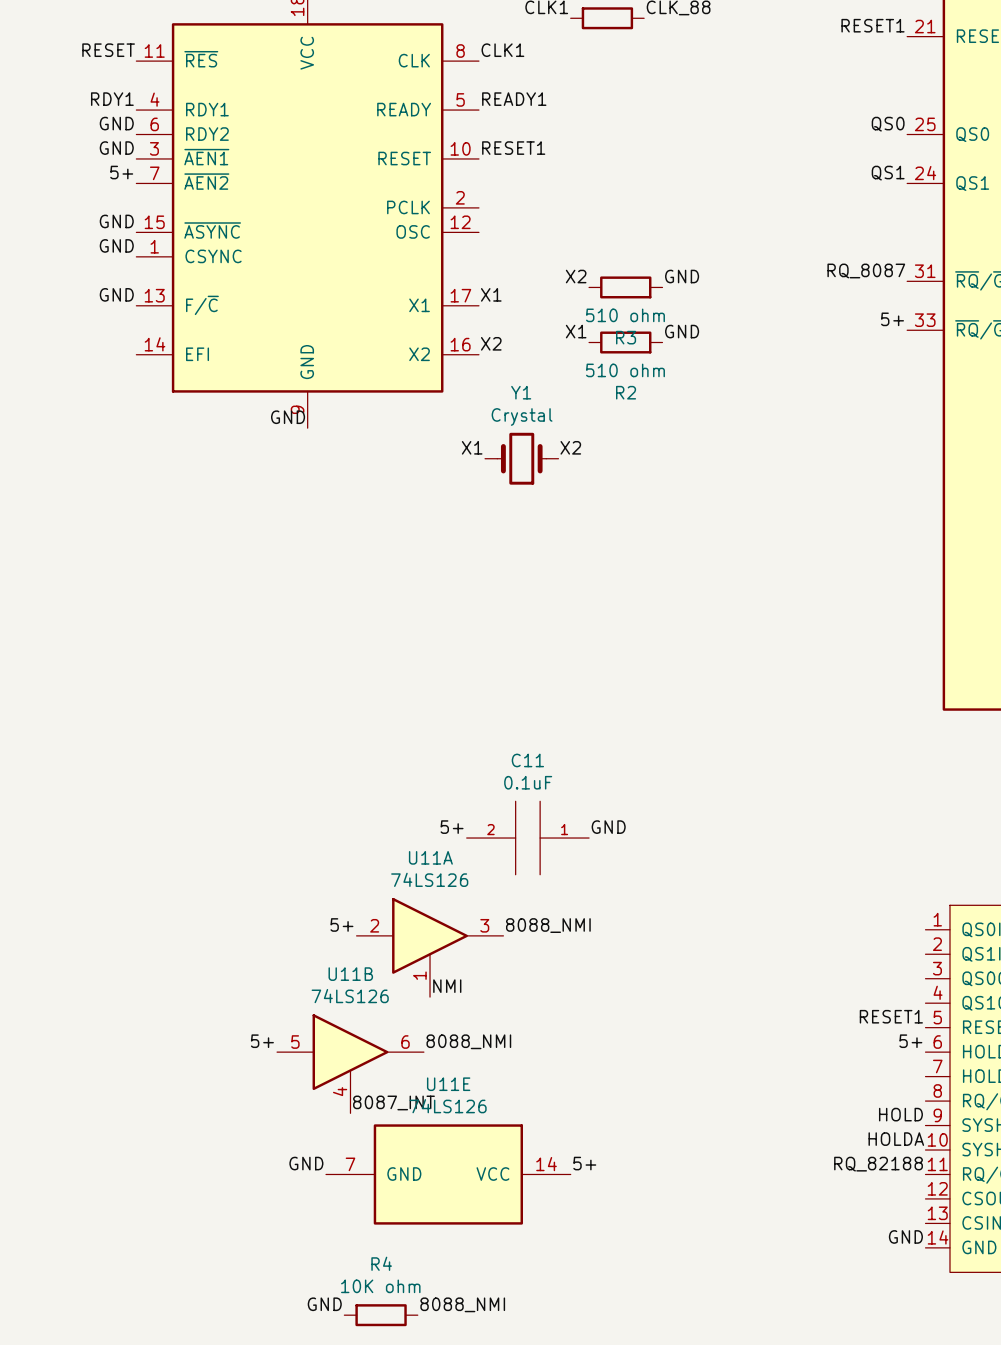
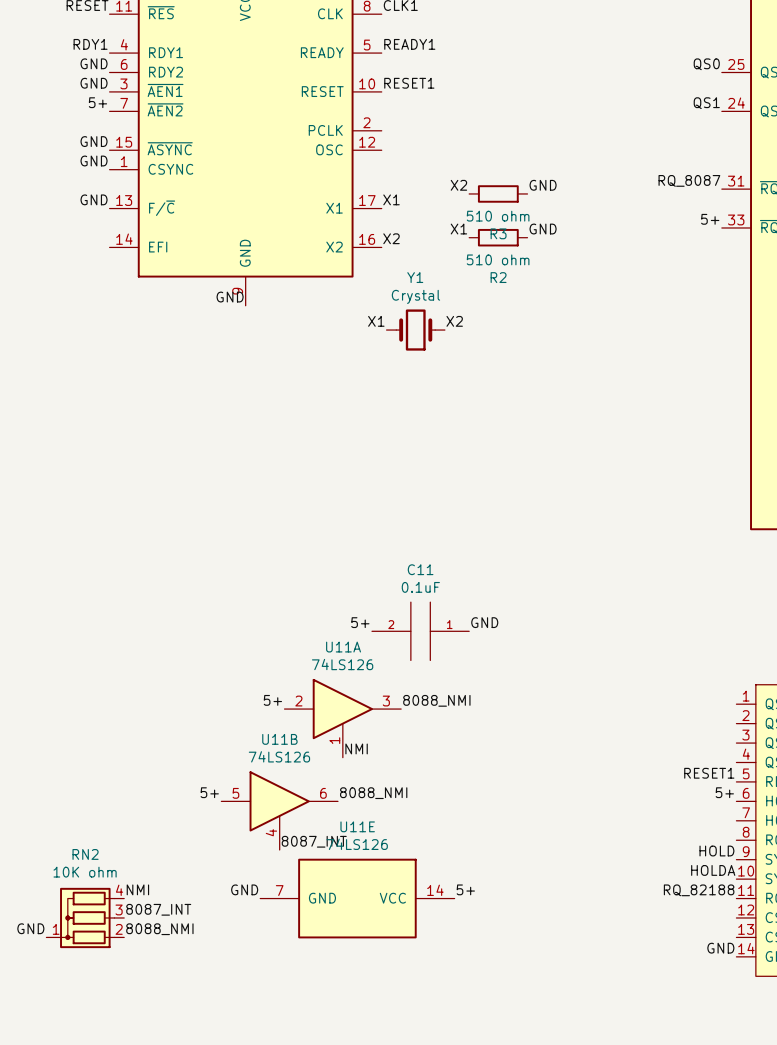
label: none -> NMI (137, 889)
label: none -> 8087_INT (158, 909)
RN2: none -> 10K ohm (85, 917)
label: none -> GND (30, 928)
label: none -> 8088_NMI (159, 929)
label: GND (324, 1304) -> none
label: 8088_NMI (462, 1304) -> none
R4: 10K ohm (381, 1315) -> none

